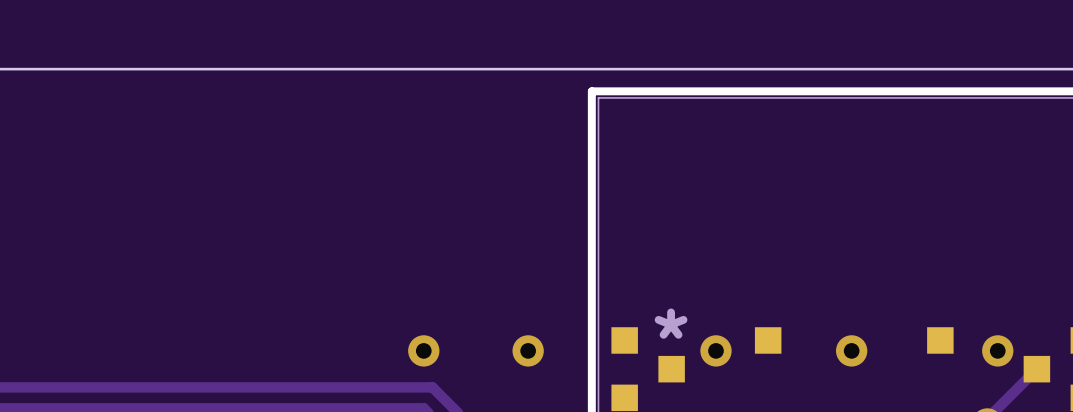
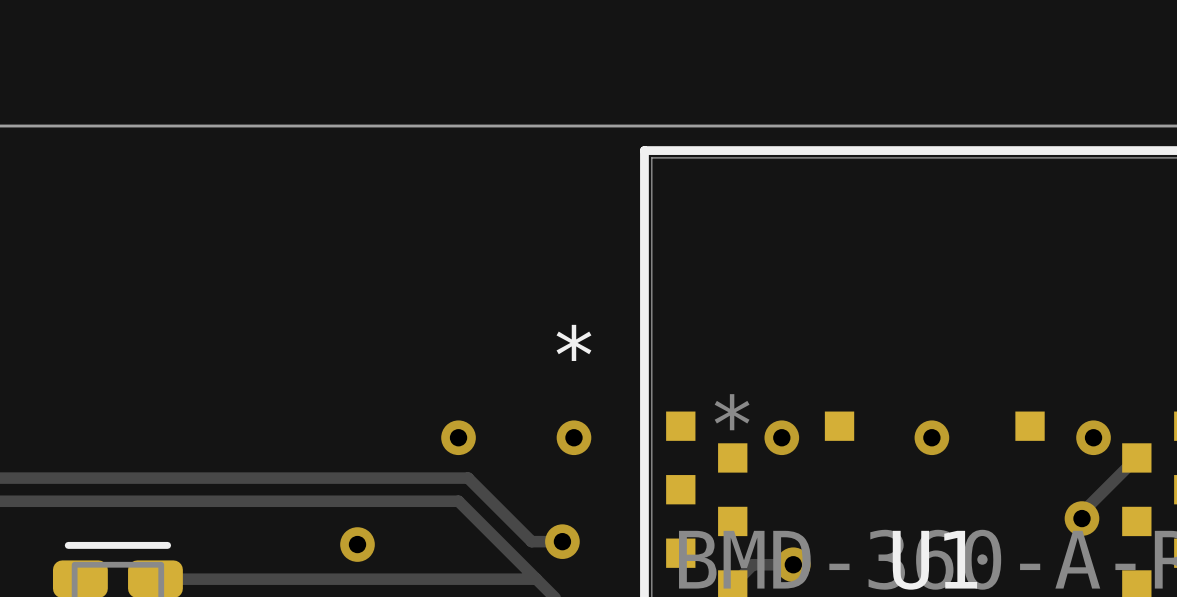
U1 text: none -> * (573, 342)

